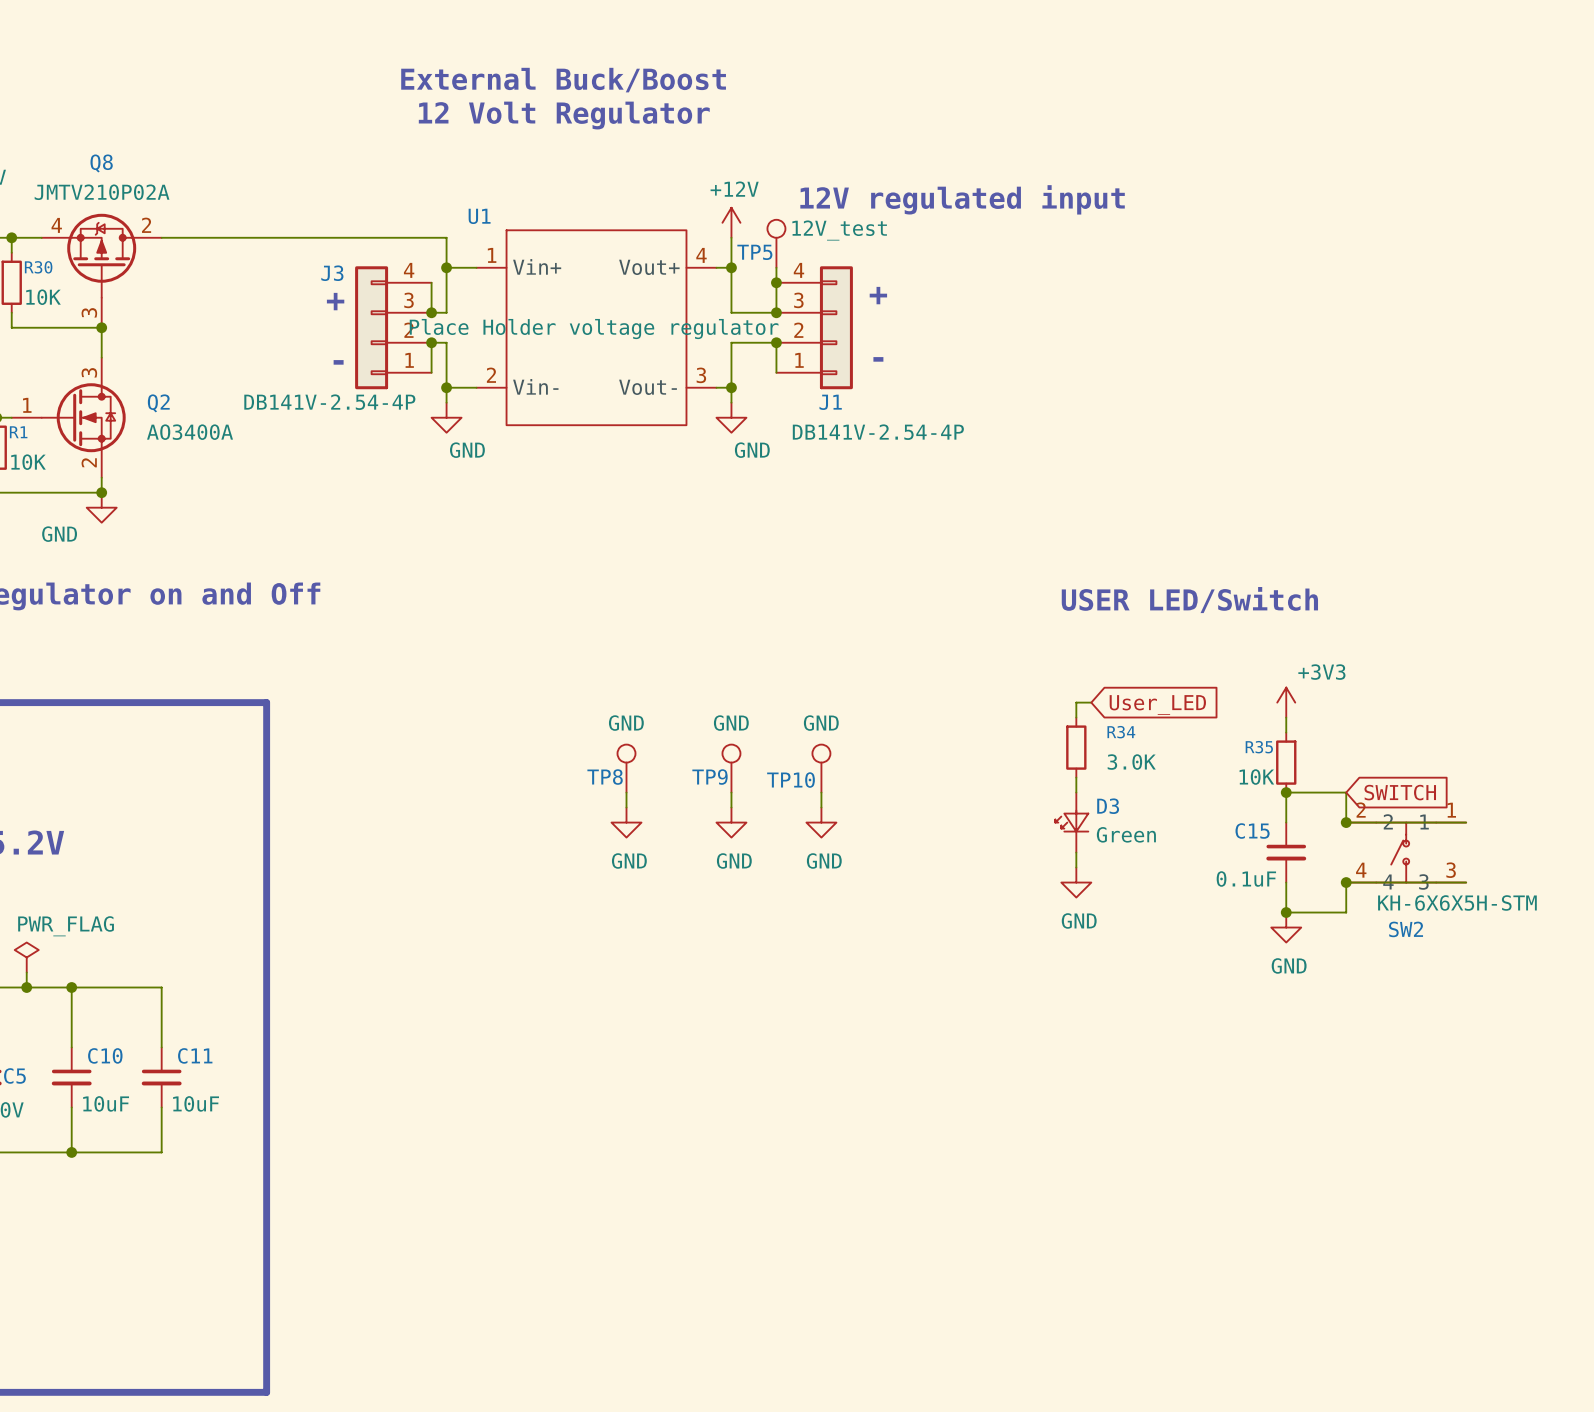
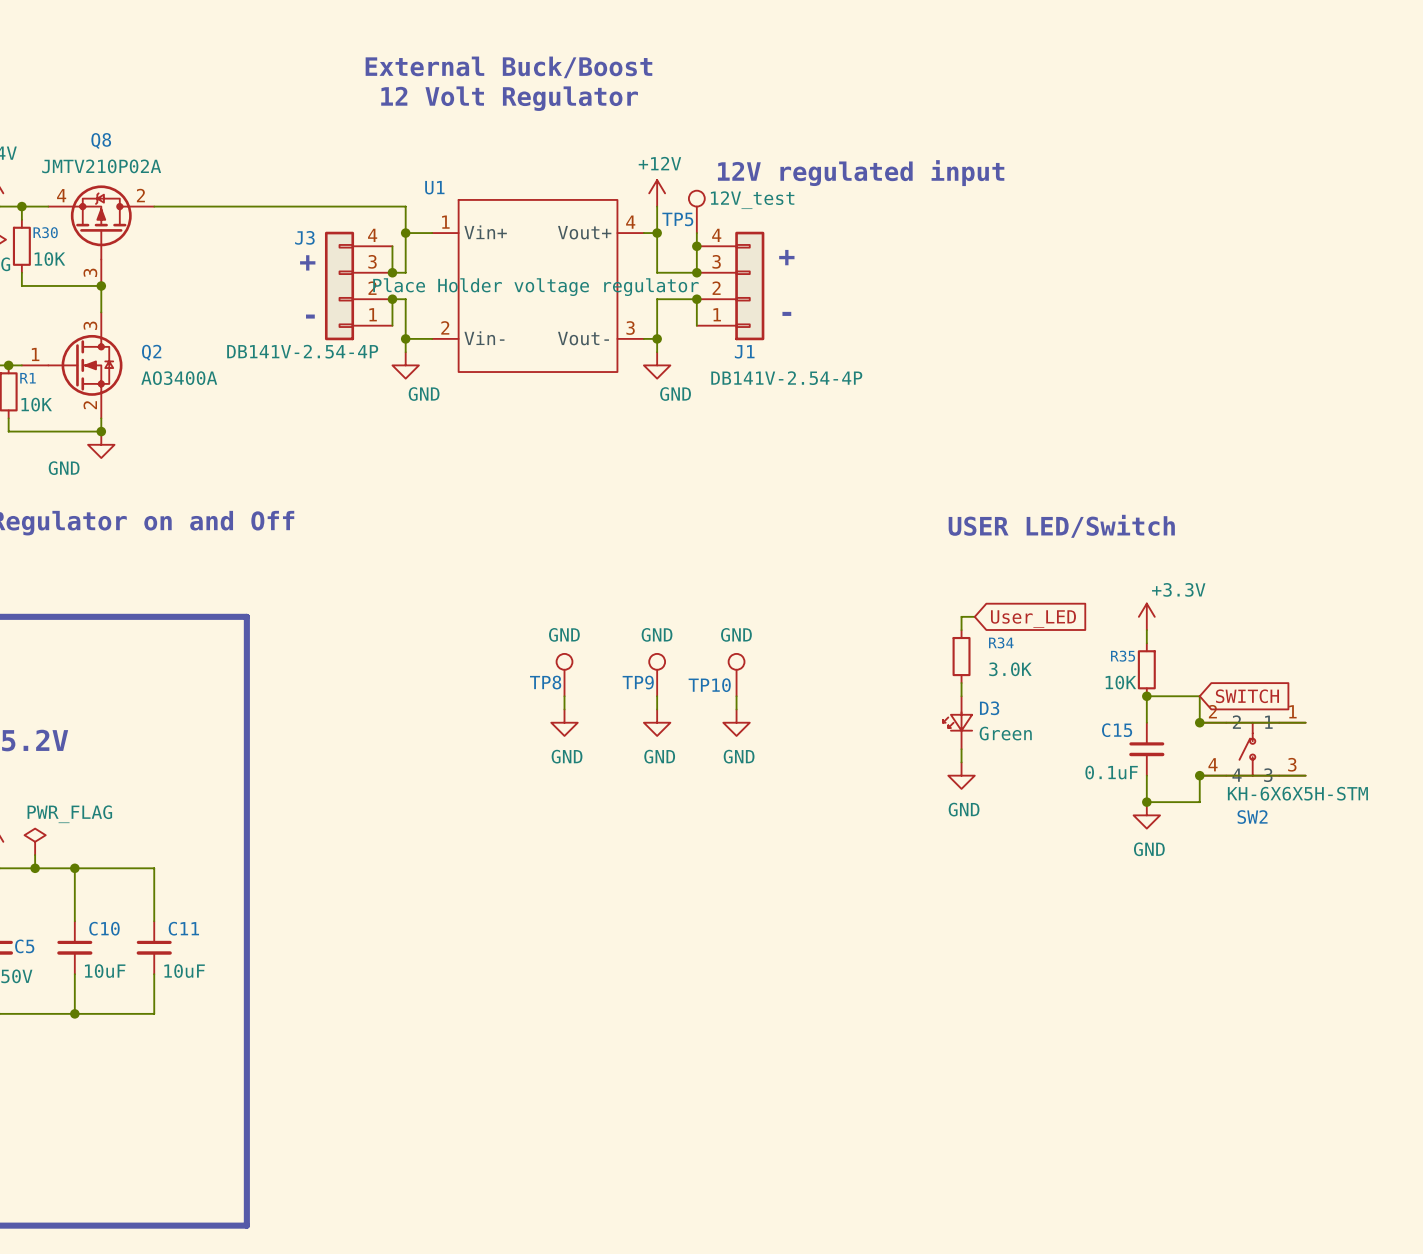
power symbol: +3V3 (1286, 702) -> +3.3V (1146, 616)

